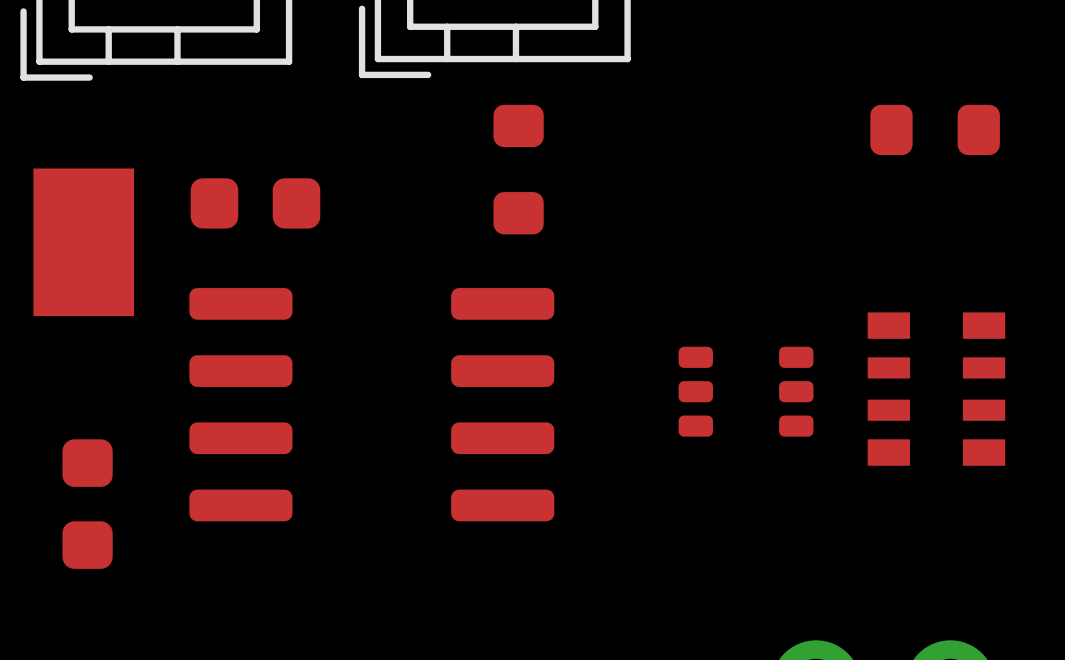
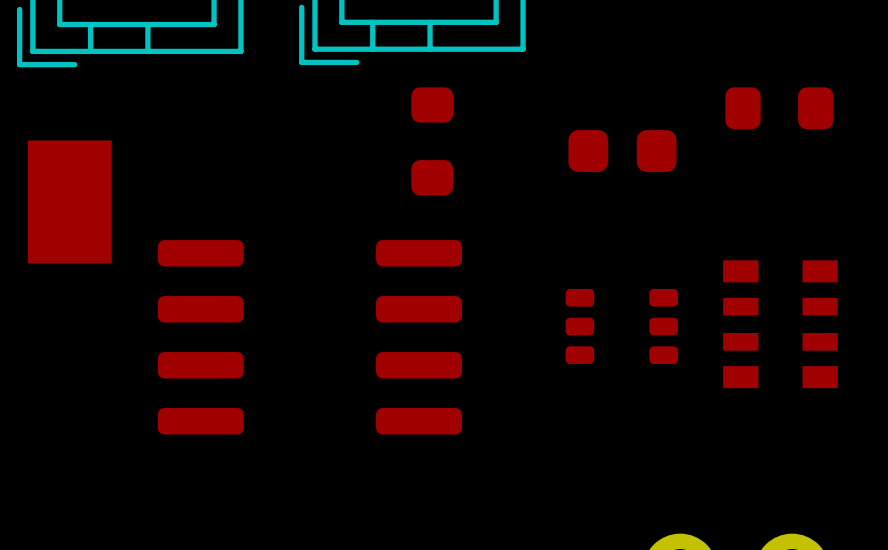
part: none -> (622, 151)
part: (255, 203) -> none
part: (87, 504) -> none

